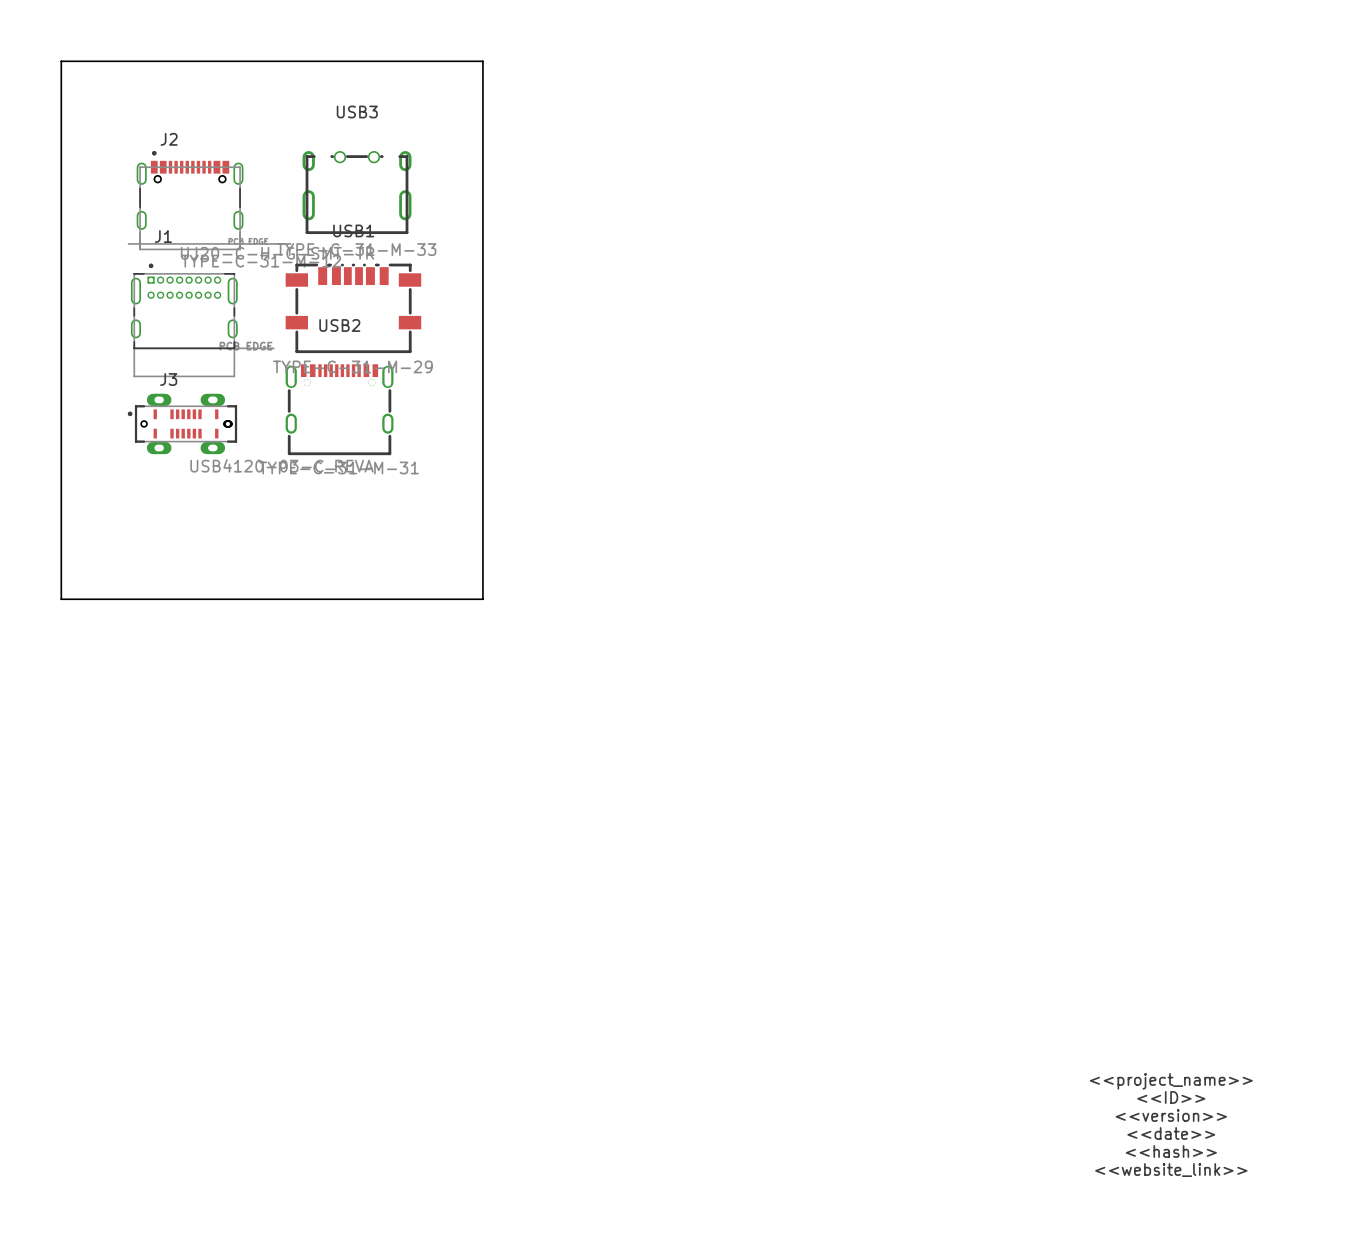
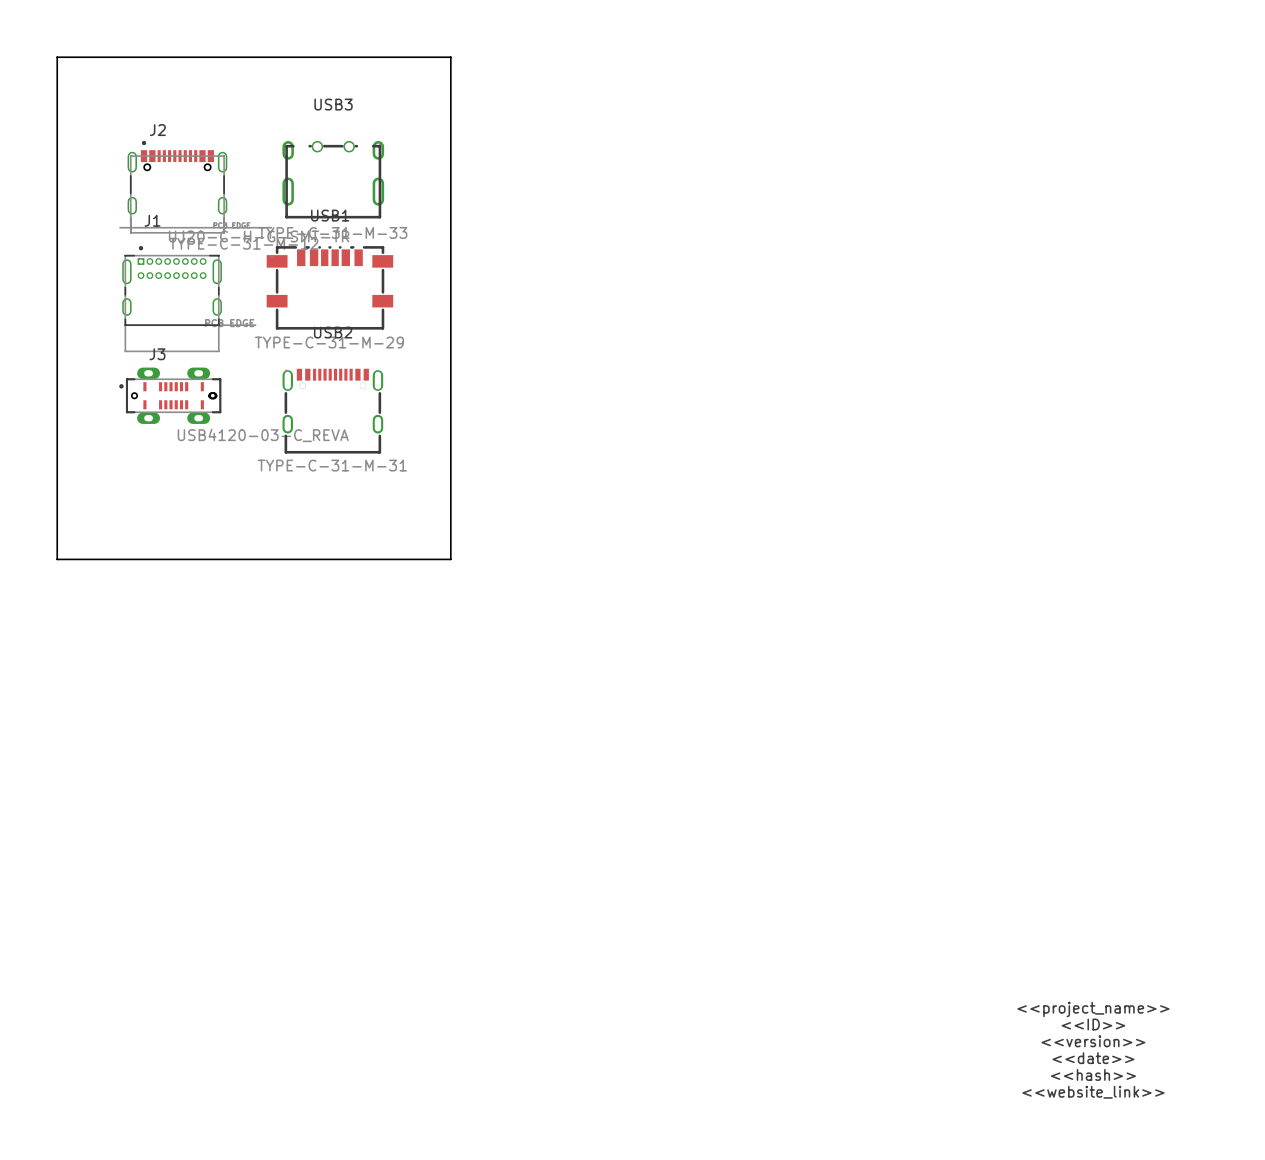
USB2 position: (339, 409) -> (332, 411)

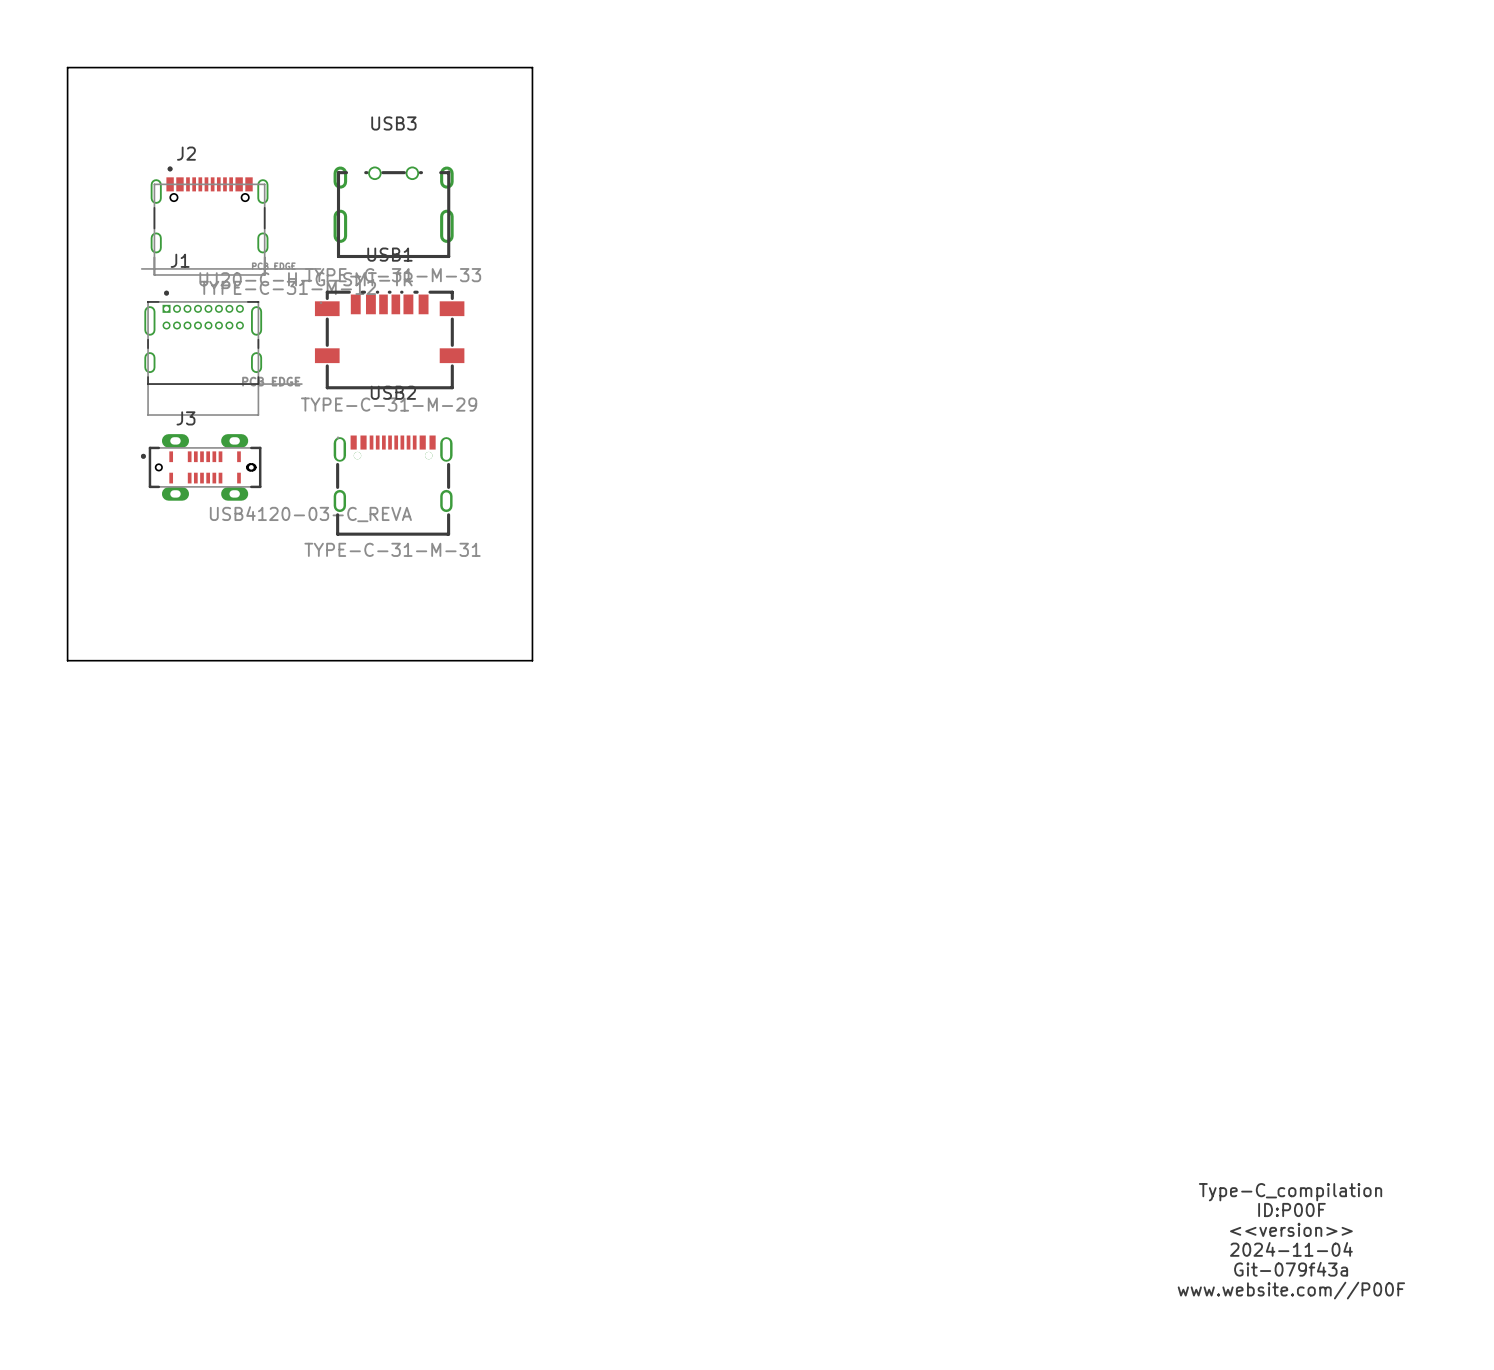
text: <<project_name>> (1093, 1009) -> Type-C_compilation (1290, 1192)
text: <<ID>> (1093, 1024) -> ID:P00F (1291, 1209)
text: <<date>> (1093, 1058) -> 2024-11-04 (1291, 1249)
text: <<hash>> (1093, 1074) -> Git-079f43a (1291, 1269)
text: <<website_link>> (1093, 1092) -> www.website.com//P00F (1291, 1290)

